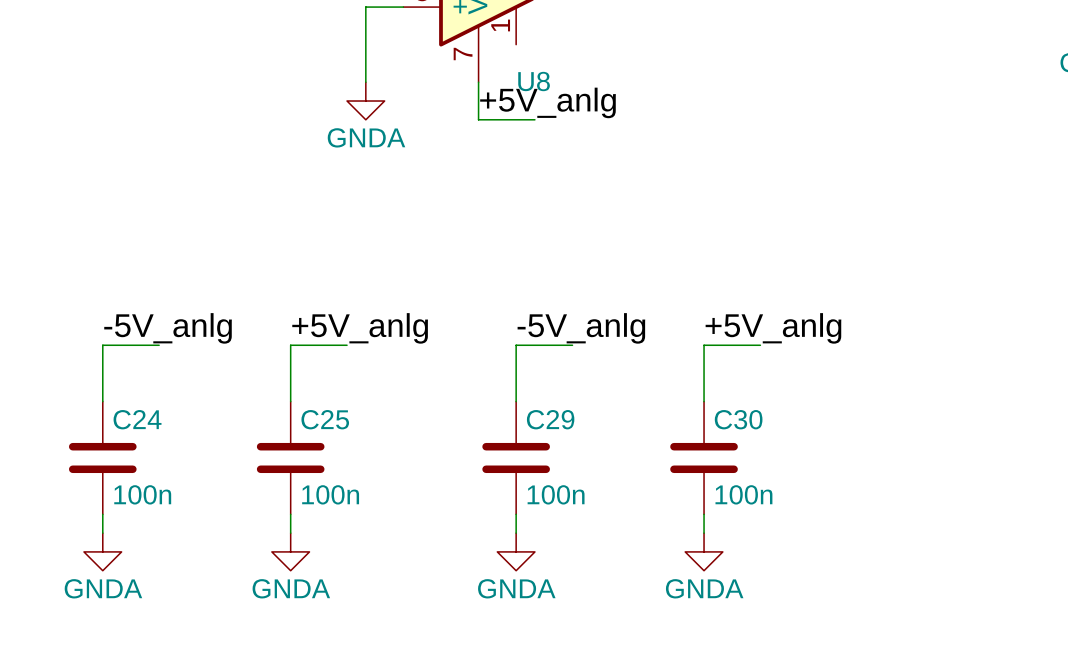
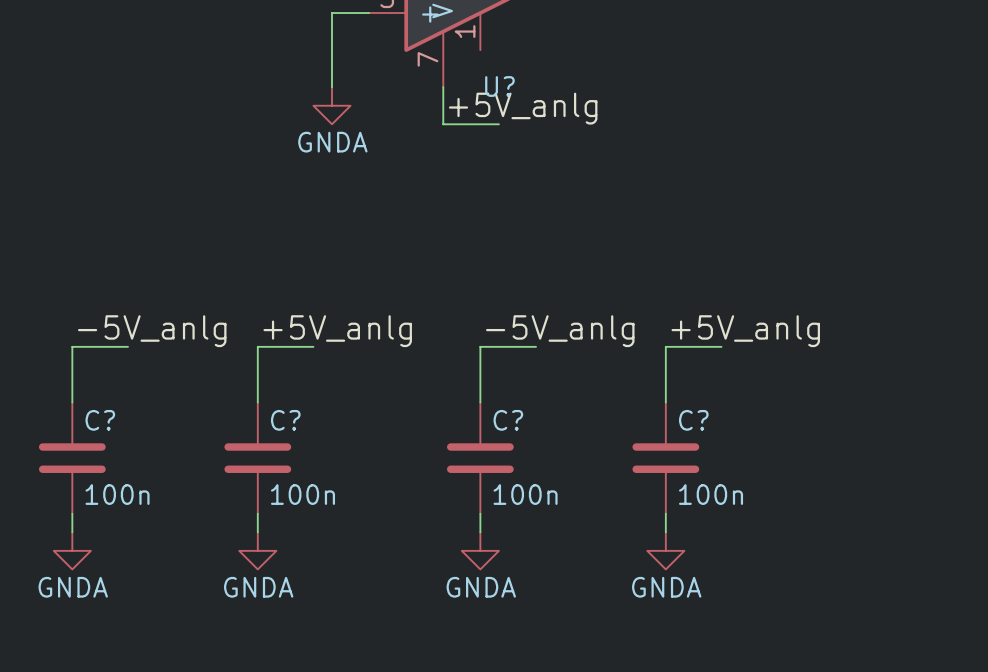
U8 name: U8 (534, 81) -> U? (499, 86)
C24 name: C24 (137, 419) -> C? (100, 420)
C25 name: C25 (325, 419) -> C? (285, 420)
C29 name: C29 (550, 419) -> C? (508, 420)
C30 name: C30 (738, 419) -> C? (693, 420)

